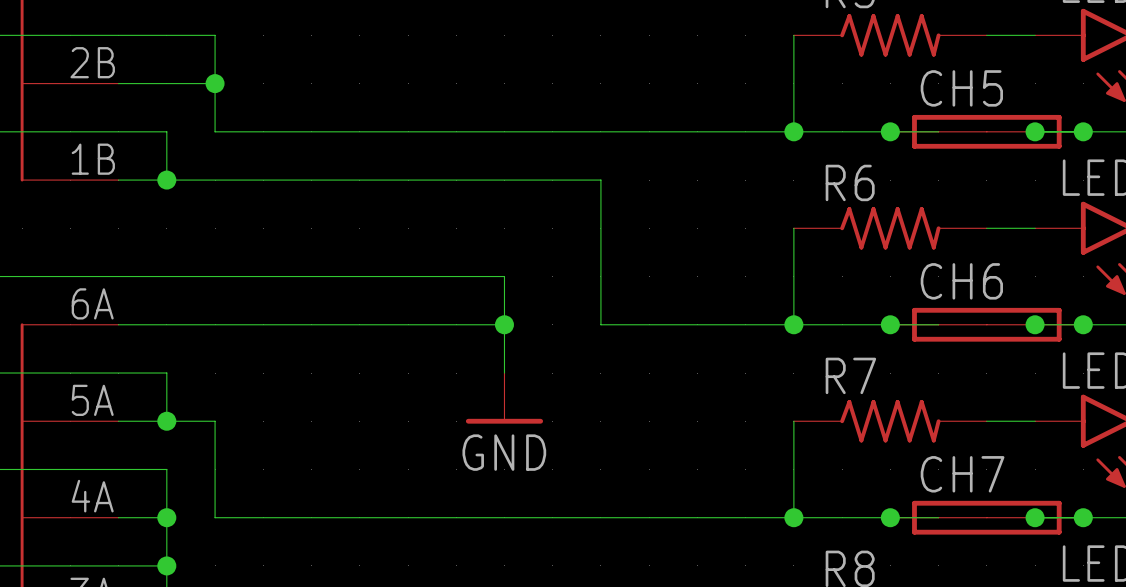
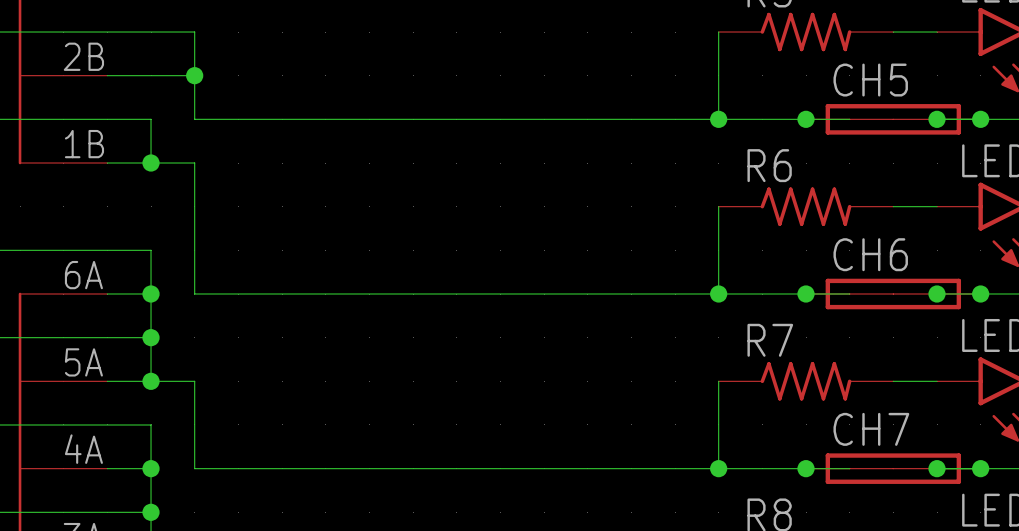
wire: (215, 180) (600, 180) (600, 324) -> (456, 294) (544, 294)
wire: (166, 276) (504, 276) (504, 373) -> (151, 250) (151, 337)
wire: (166, 324) (215, 324) -> (194, 163) (194, 294)
junction: none -> (151, 294)
junction: (504, 324) -> none
junction: none -> (151, 337)
power symbol: GND (504, 398) -> none

